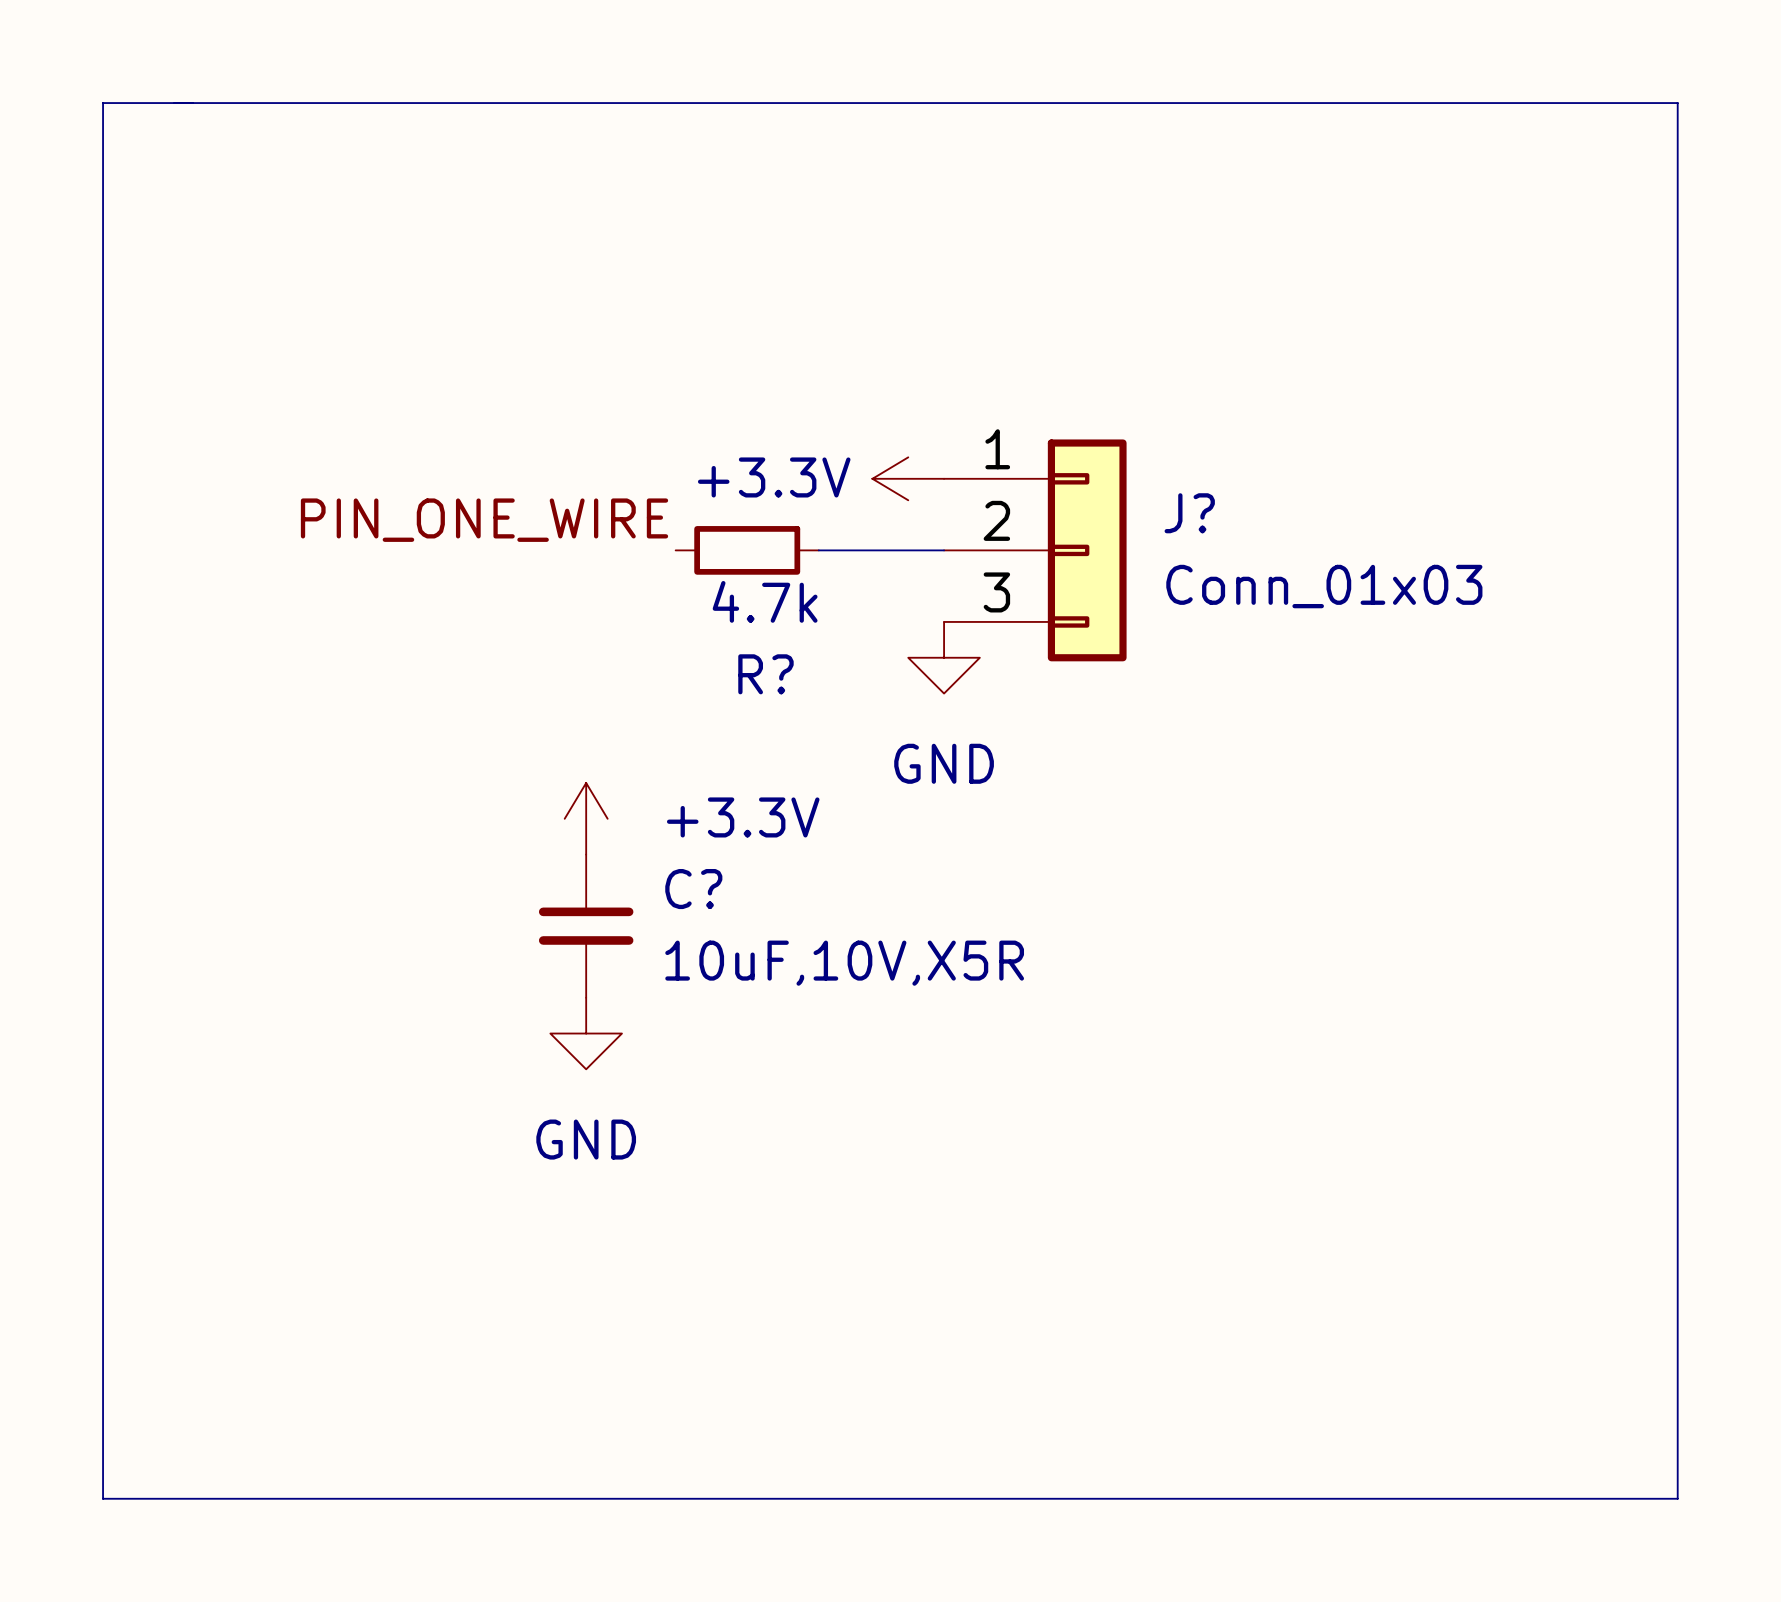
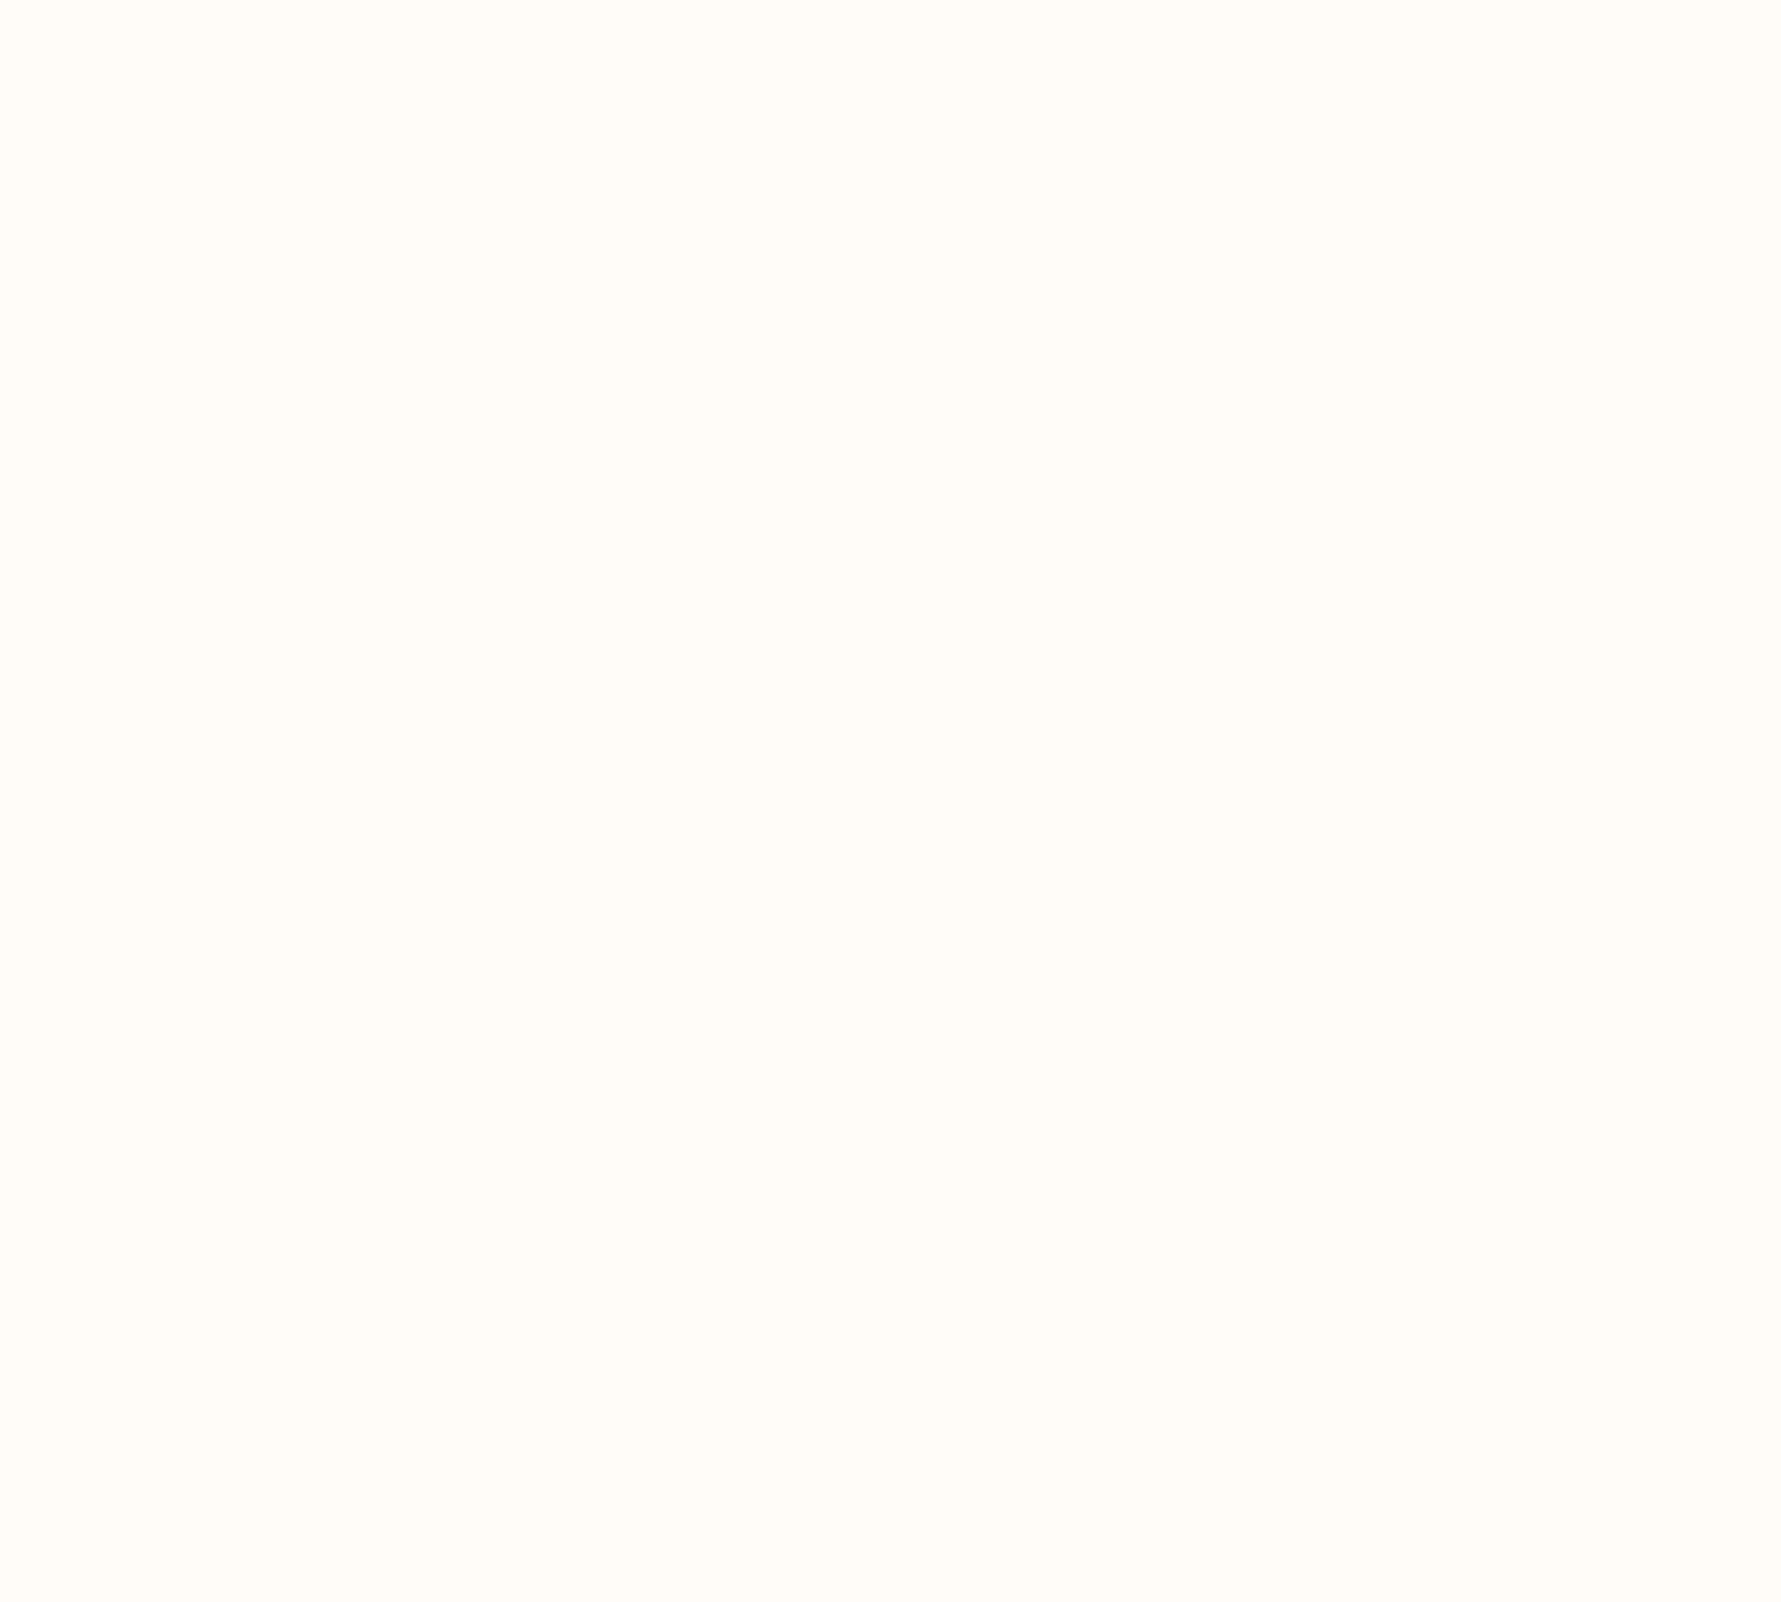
line: (103, 103) (1677, 103) (1677, 1498) (103, 1498) (103, 103) -> none
power symbol: +3.3V (908, 478) -> none
label: PIN_ONE_WIRE (484, 520) -> none
R?: 4.7k (747, 550) -> none
wire: (818, 550) (944, 550) -> none
J?: Conn_01x03 (1035, 550) -> none
power symbol: GND (944, 657) -> none
power symbol: +3.3V (586, 818) -> none
C?: 10uF,10V,X5R (586, 926) -> none
power symbol: GND (586, 1033) -> none

